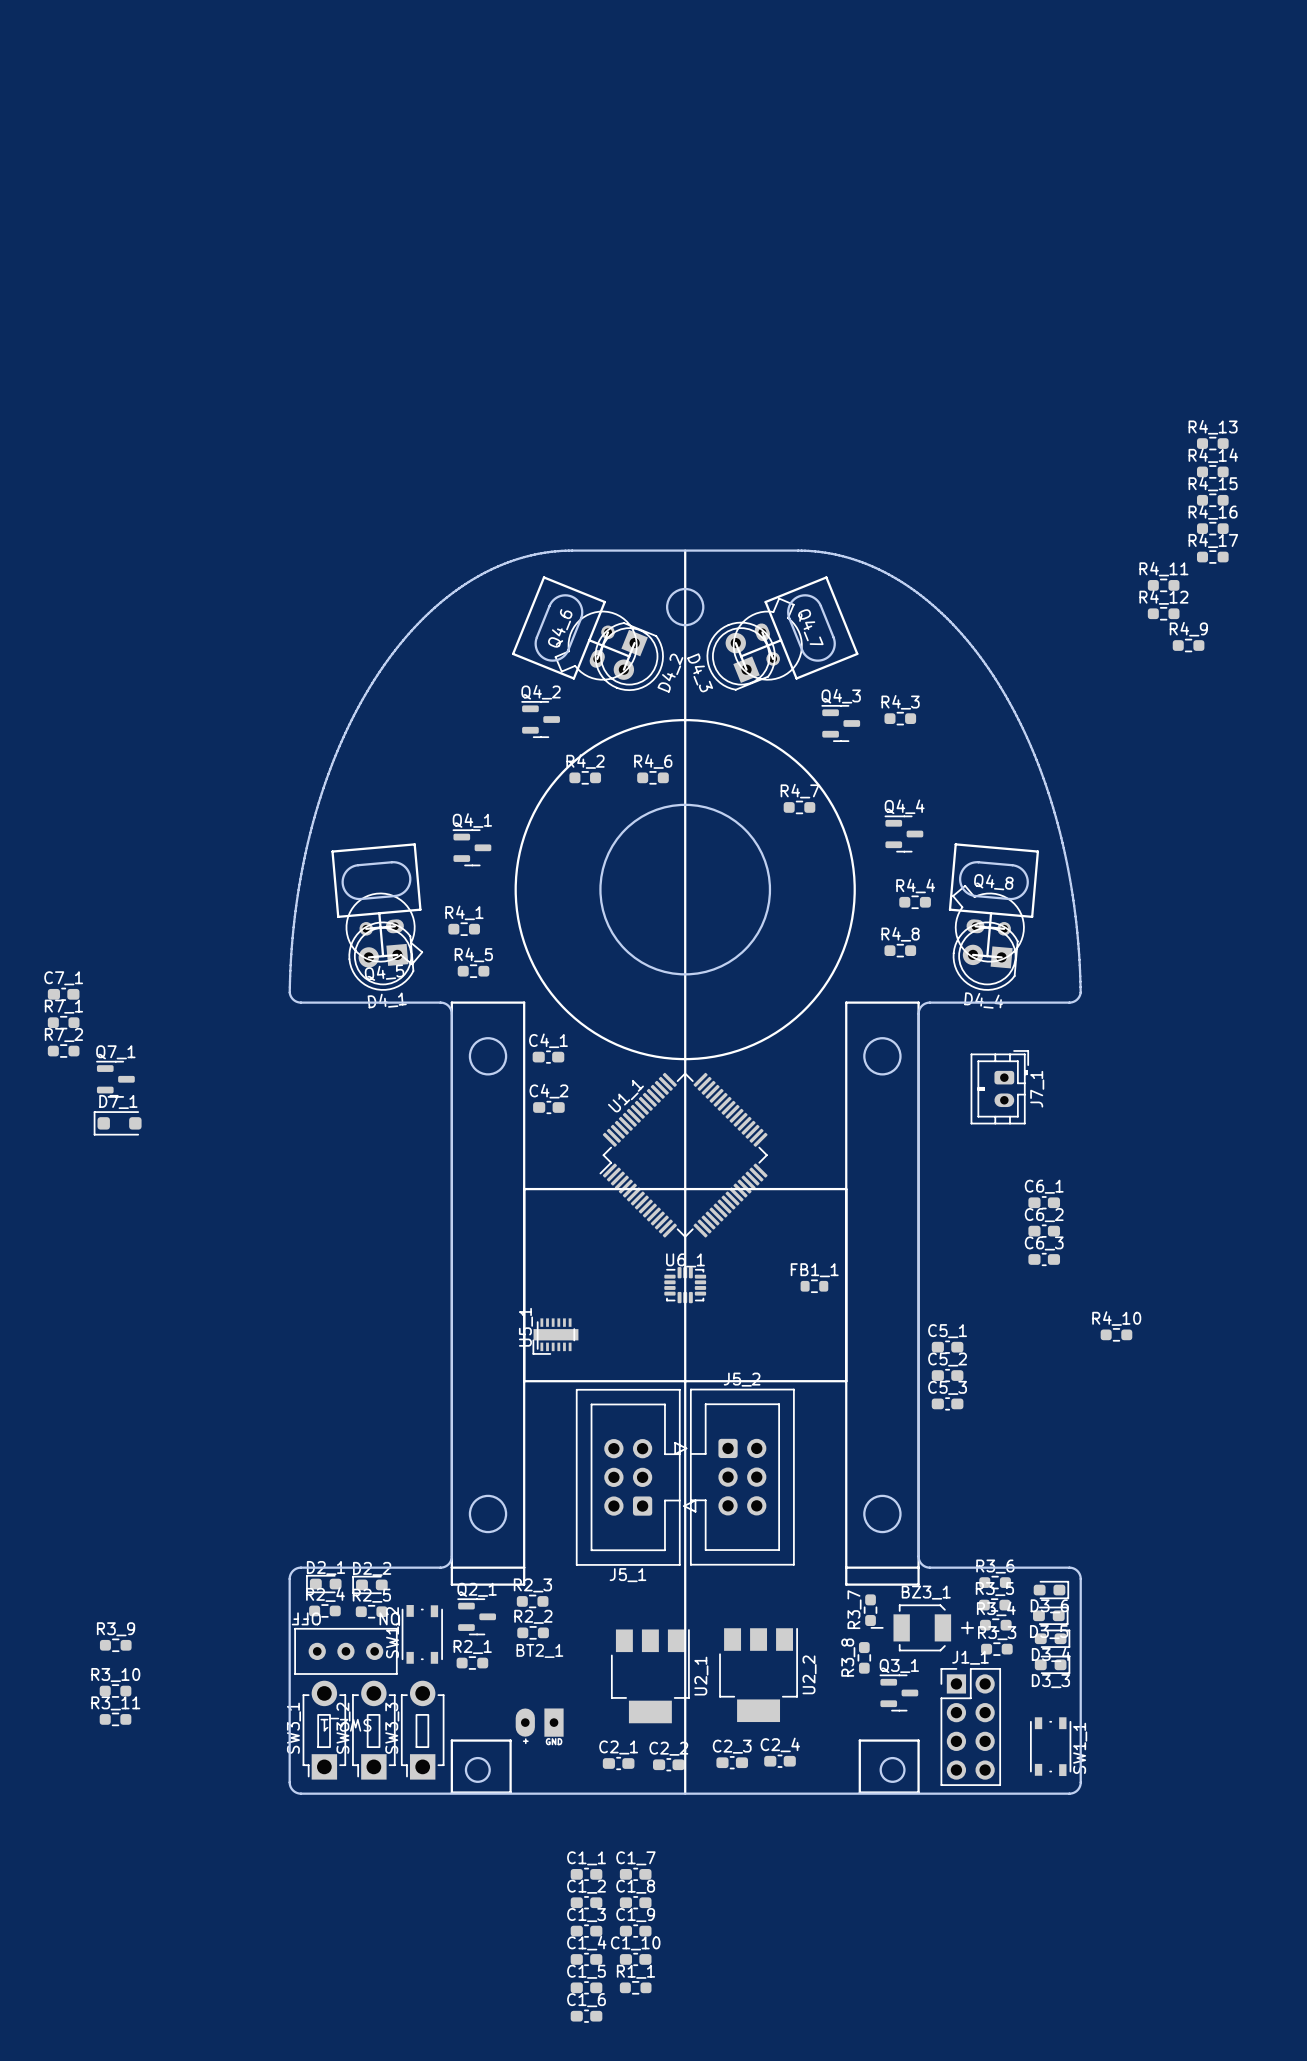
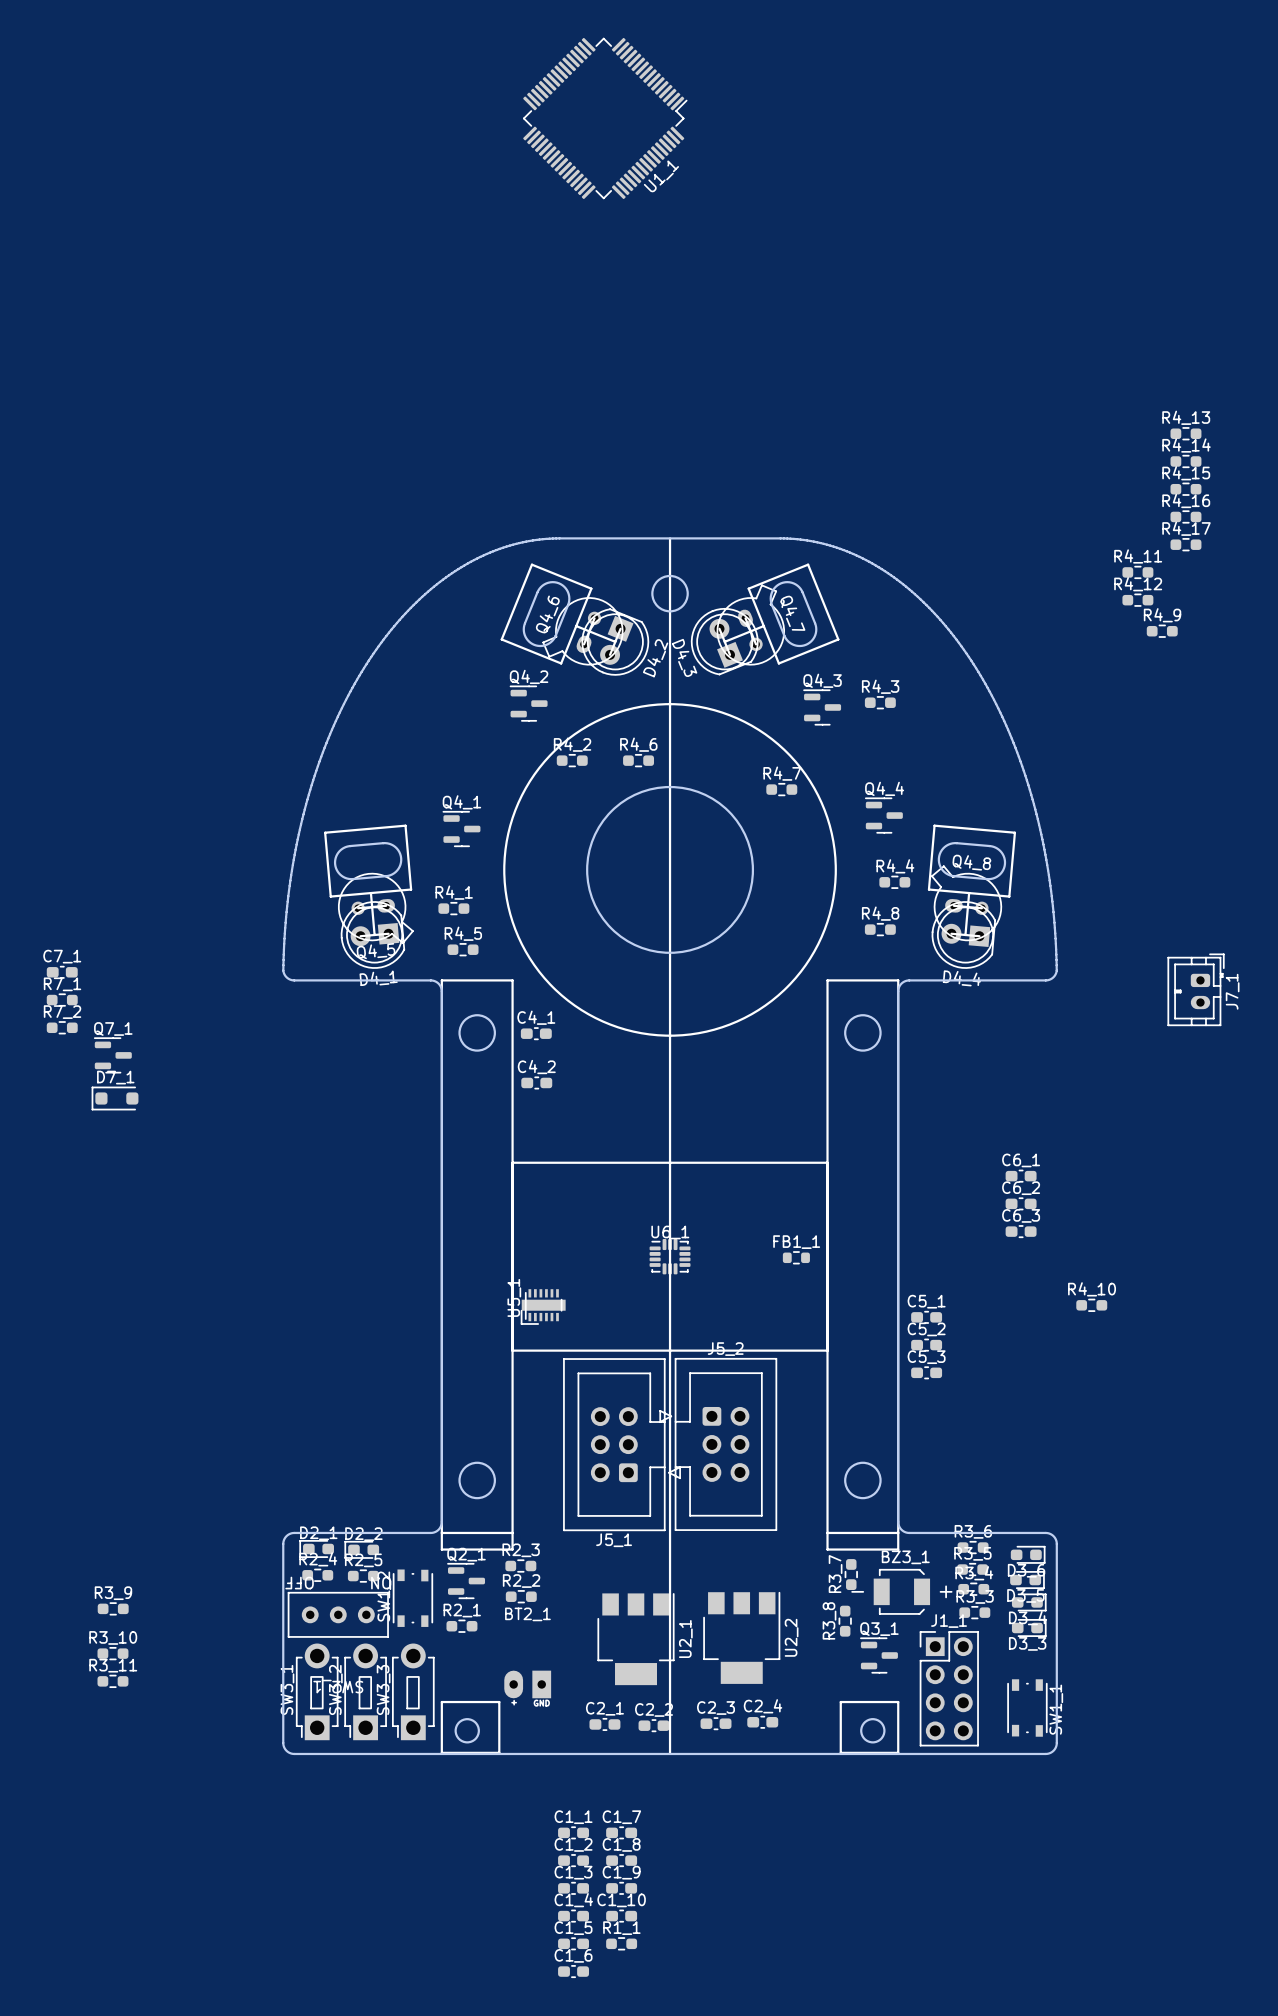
J7_1 position: (999, 1087) -> (1196, 989)
U1_1 rotation: 0° (683, 1155) -> 180° (605, 118)
U1_1 position: (683, 1155) -> (605, 118)

